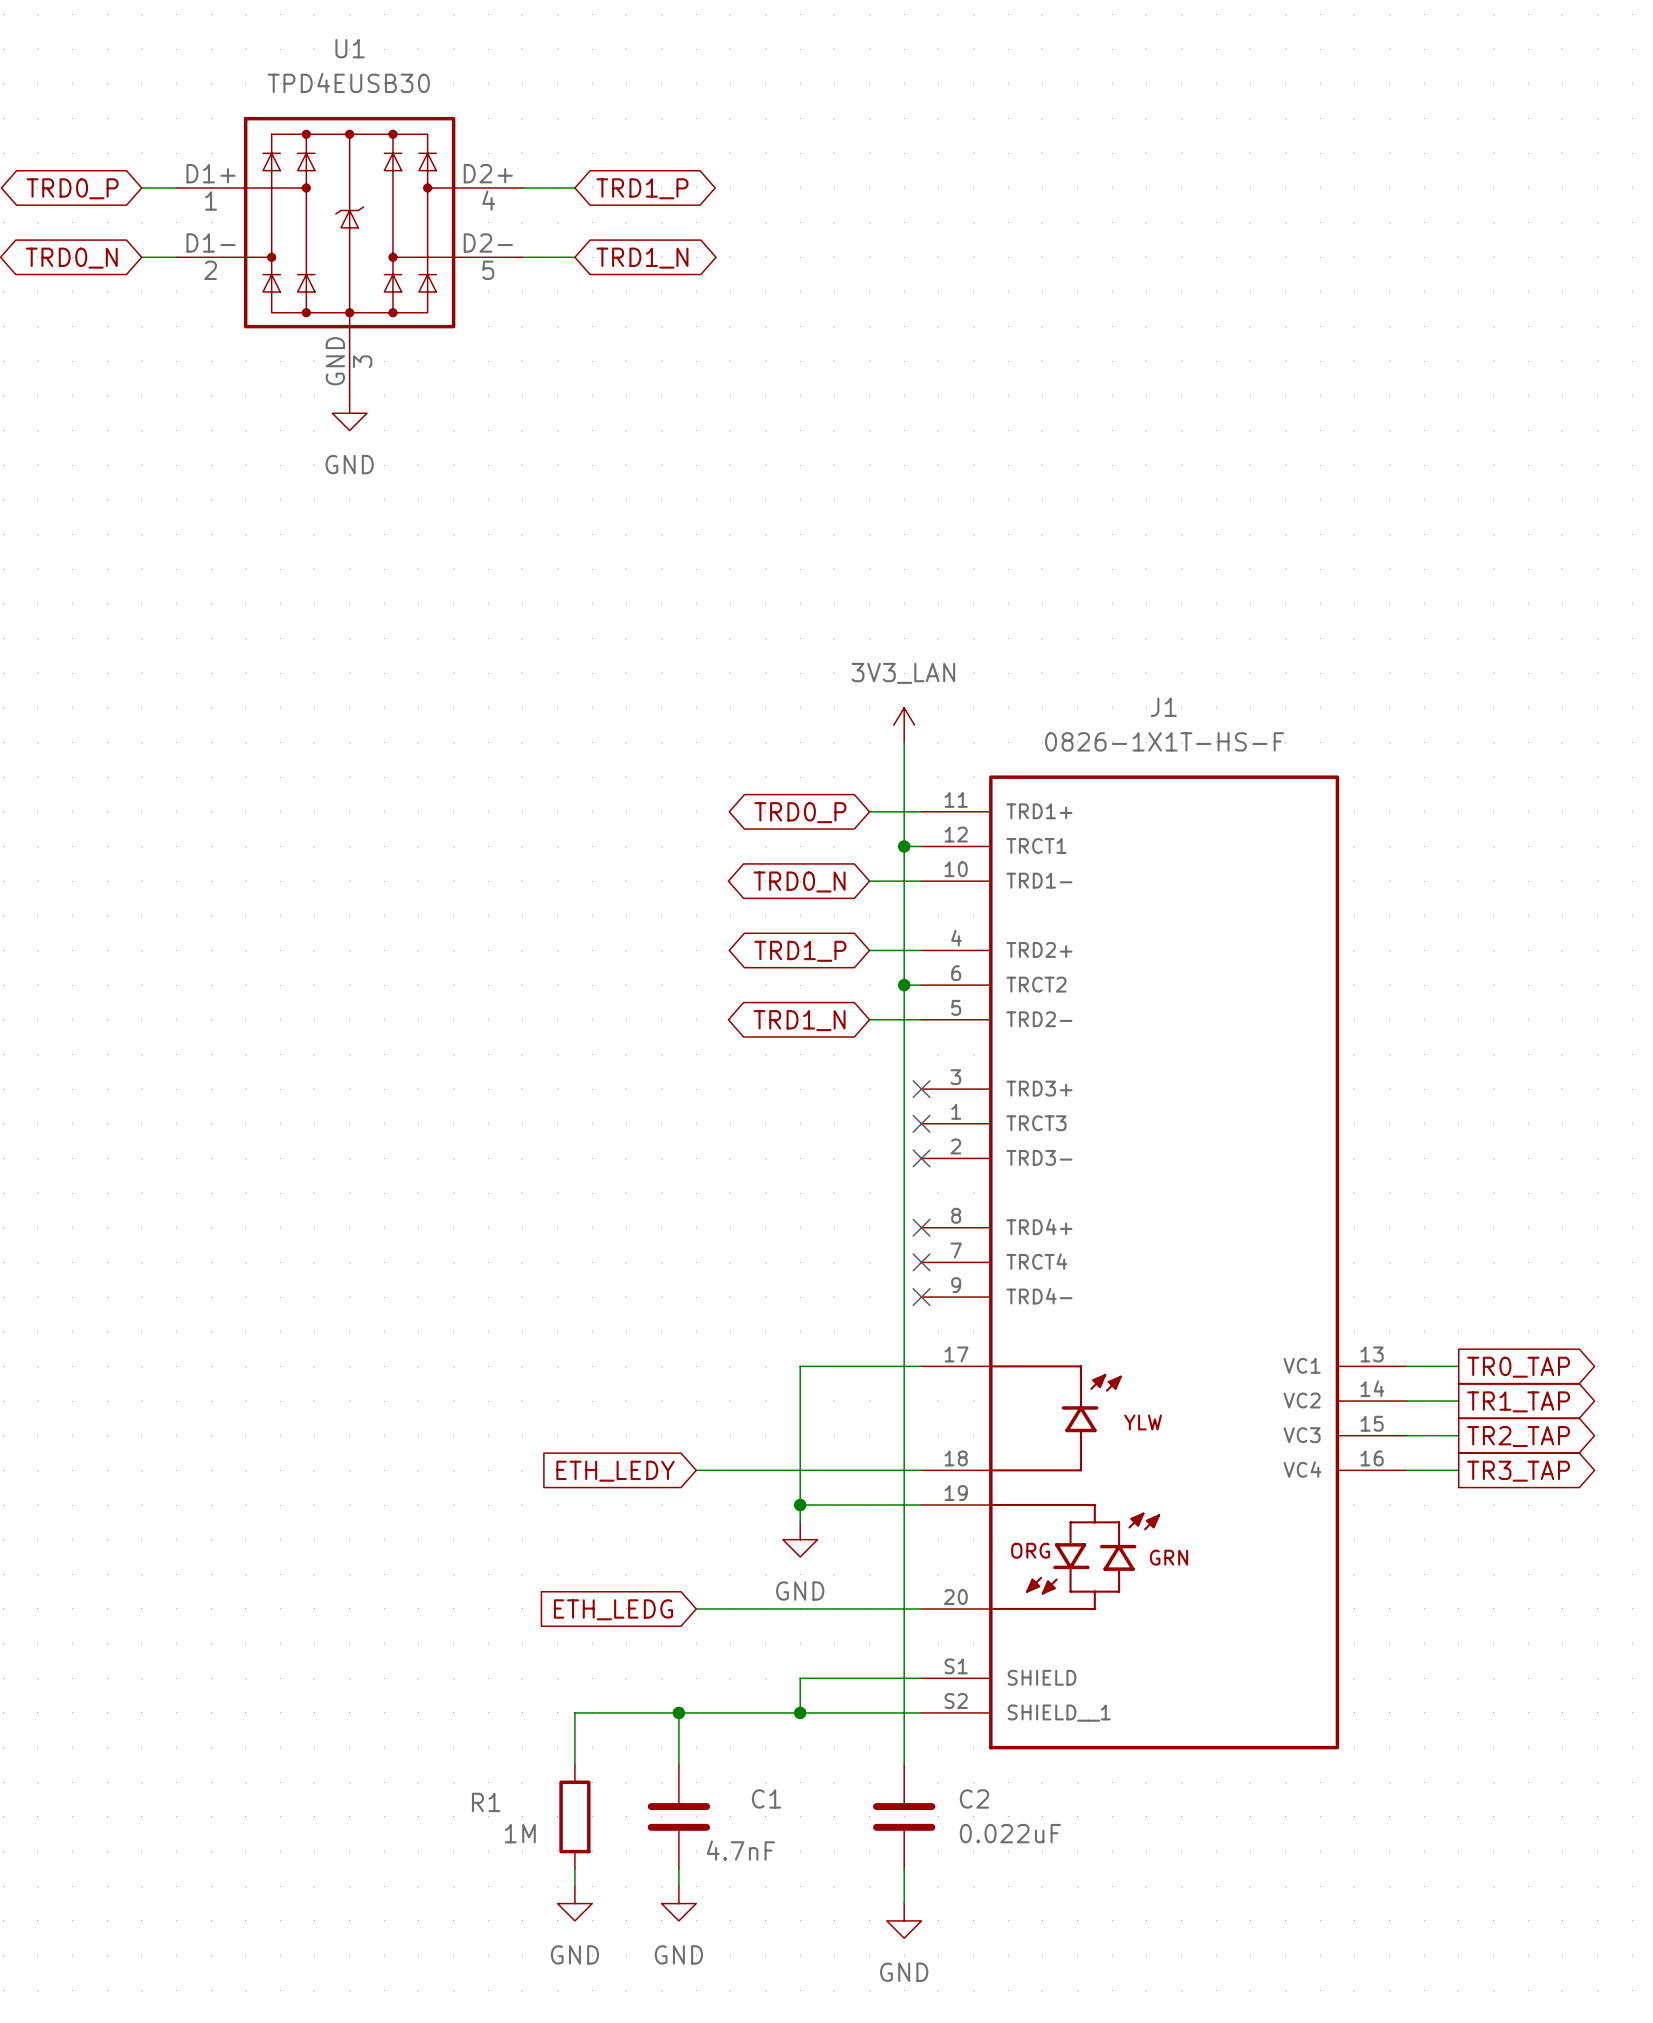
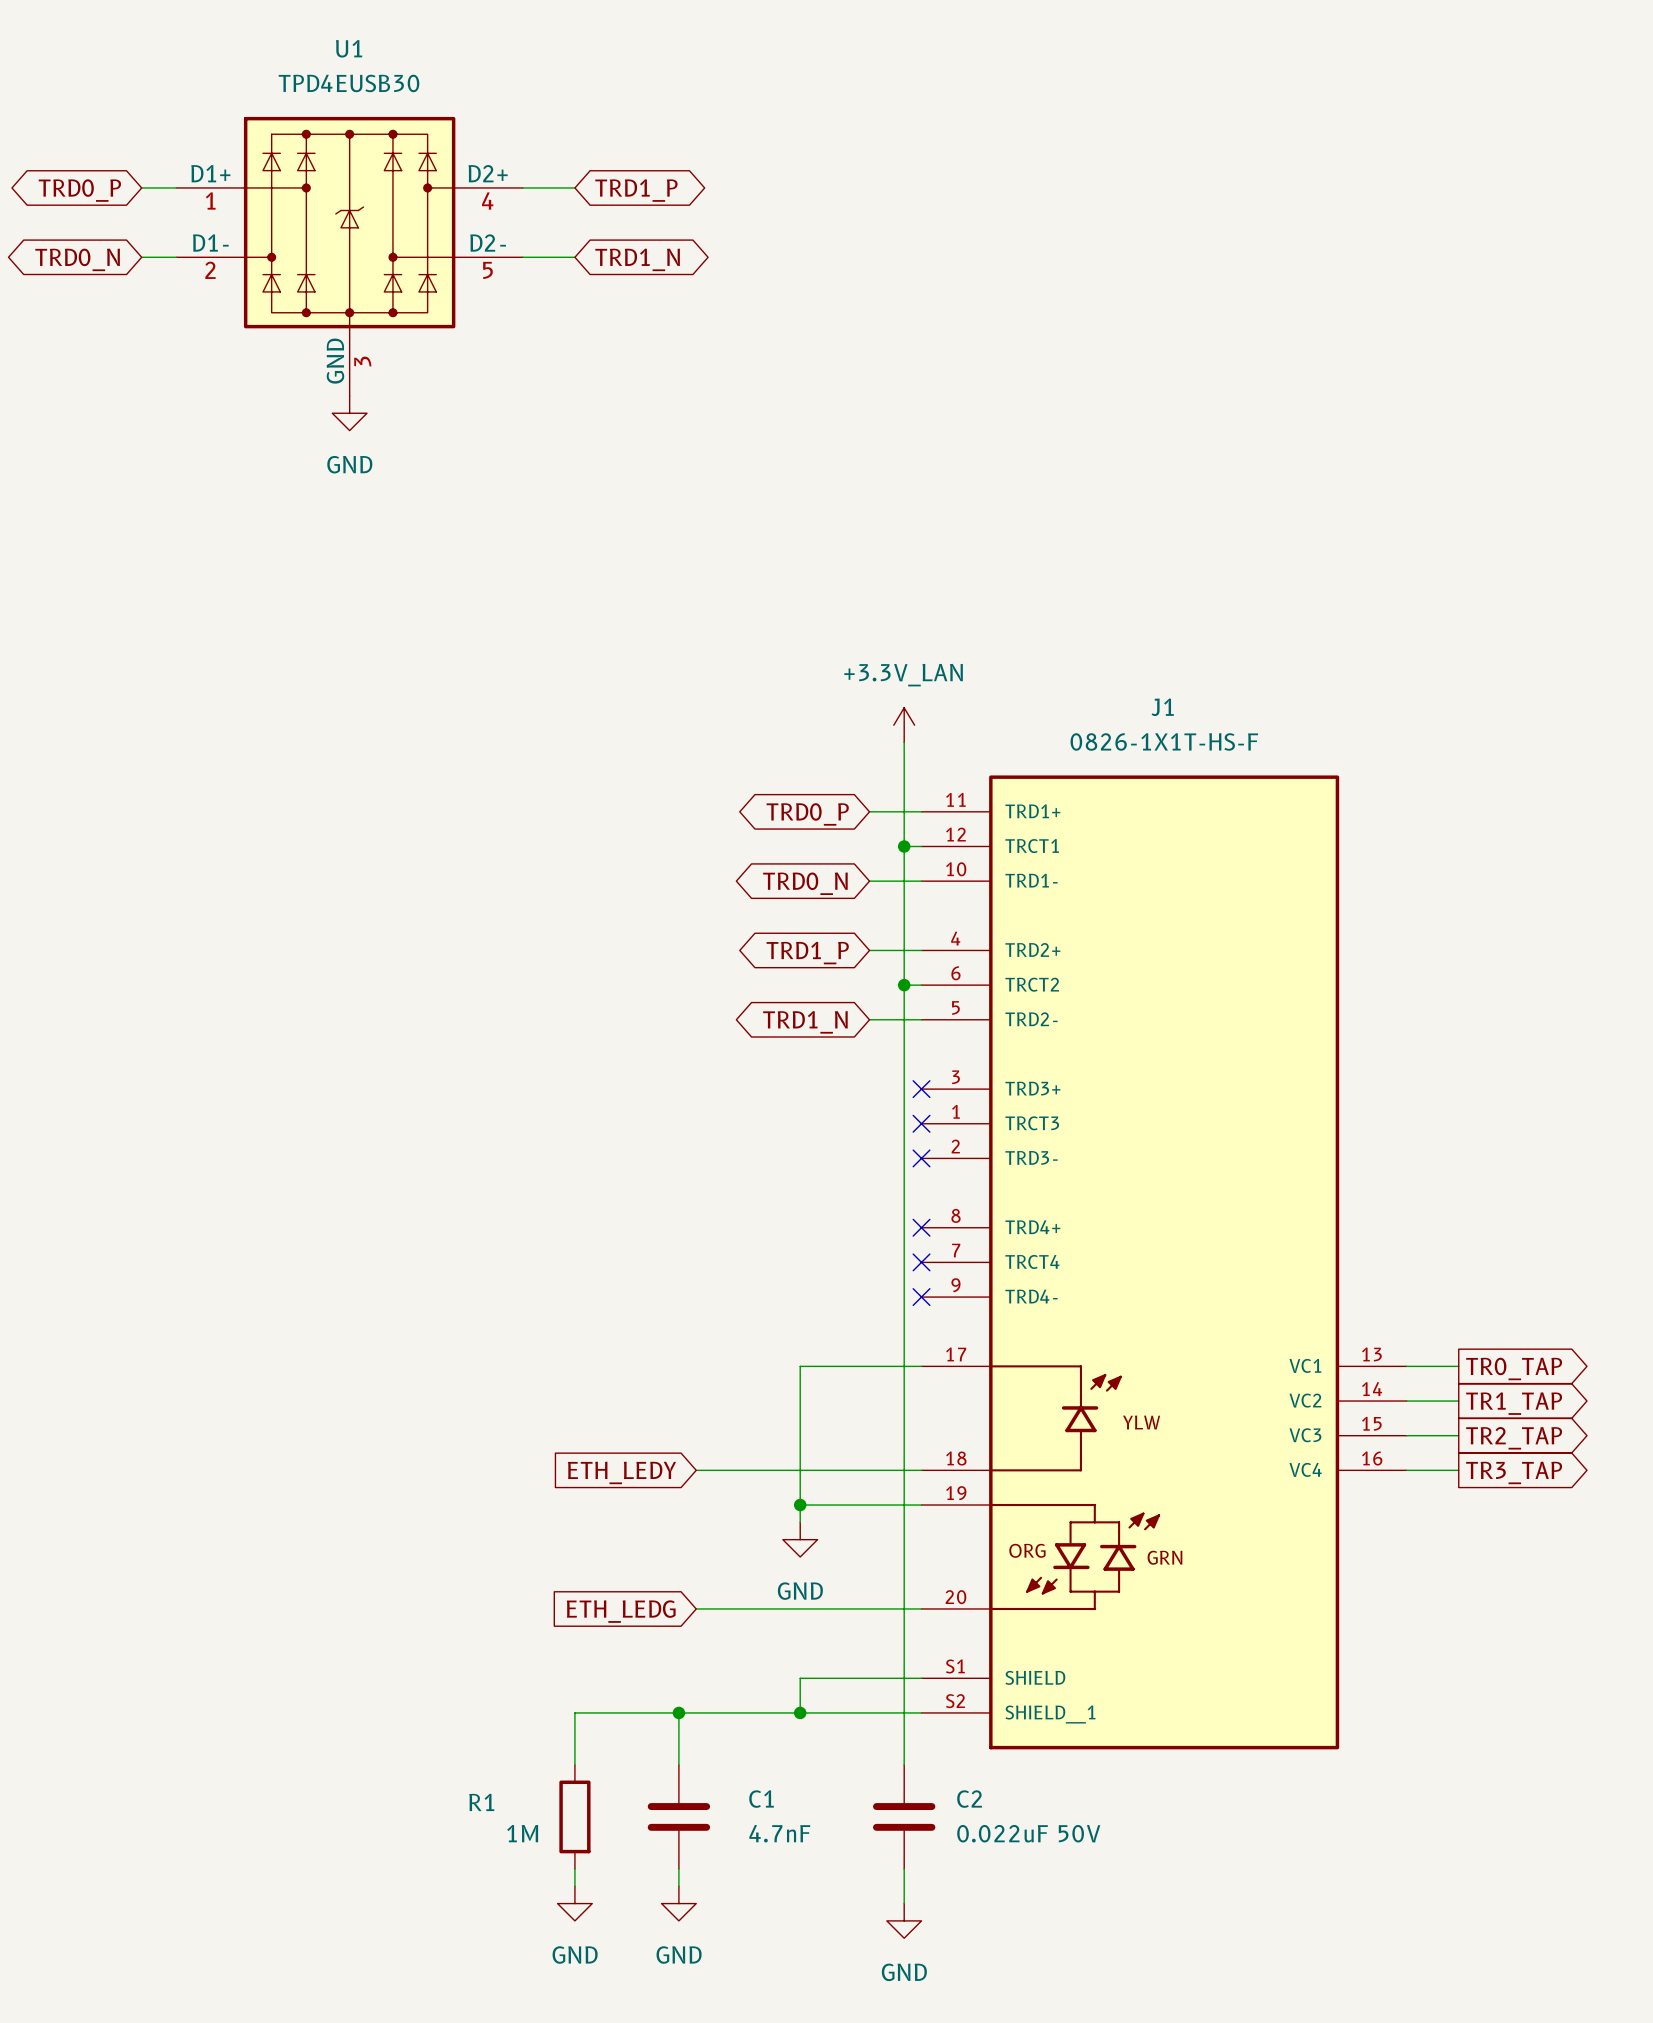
power symbol: 3V3_LAN (904, 725) -> +3.3V_LAN (904, 725)
C2 value: 0.022uF (1010, 1833) -> 0.022uF 50V (1028, 1833)
C1 value position: 4.7nF (740, 1850) -> 4.7nF (779, 1833)

